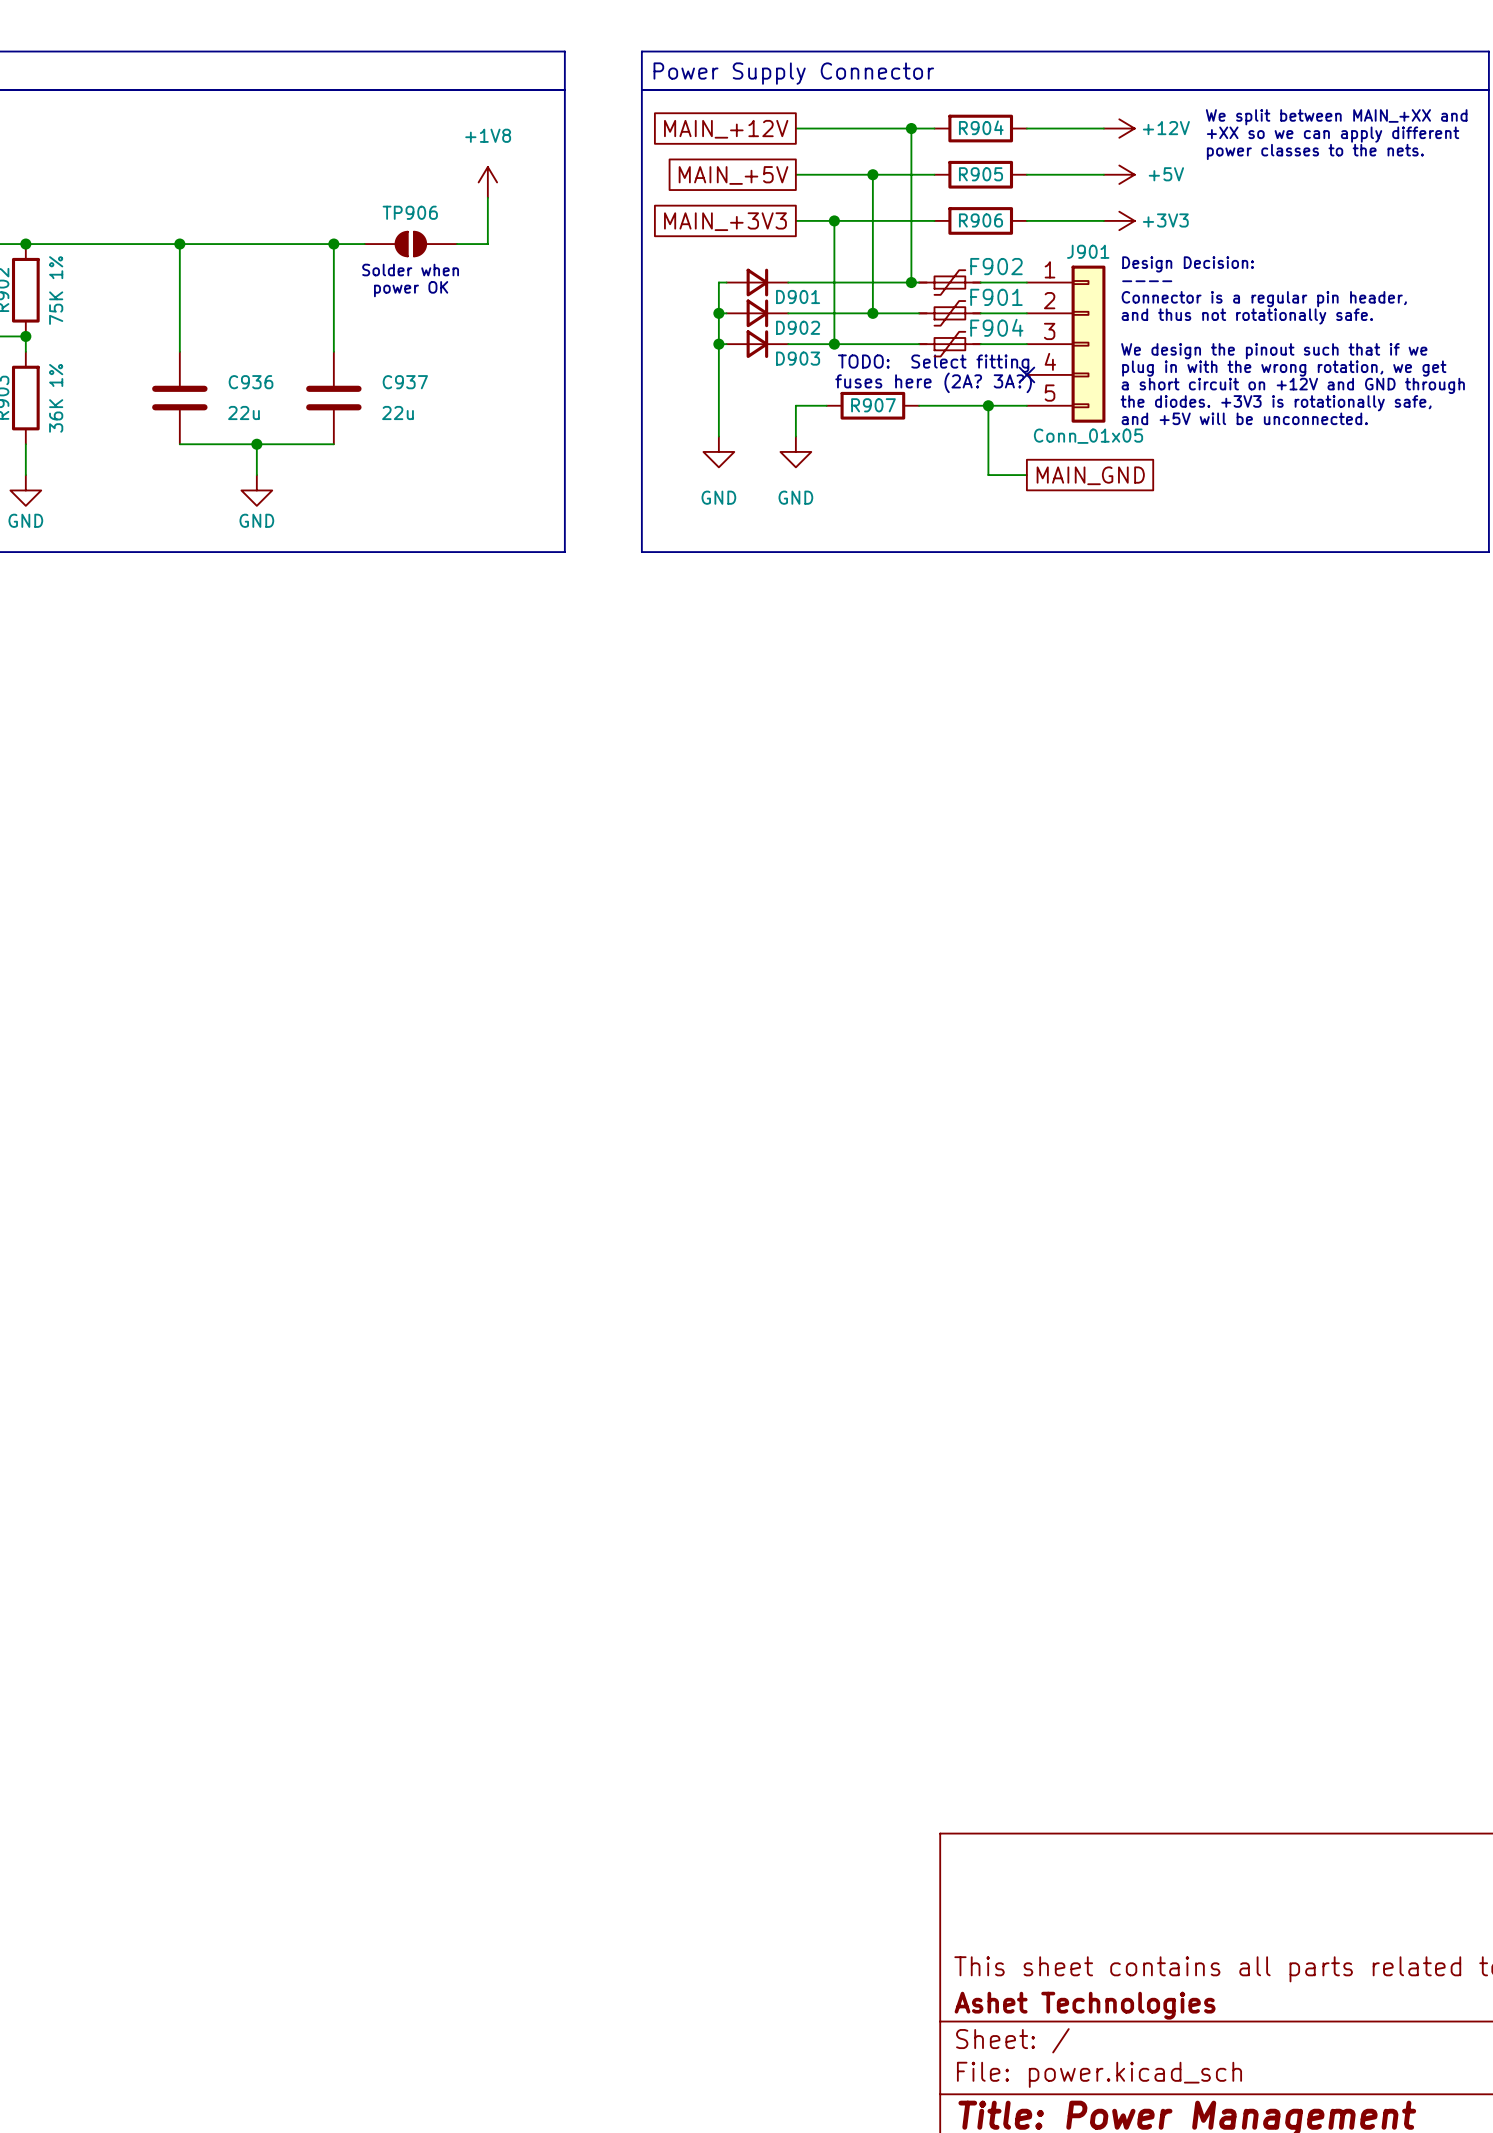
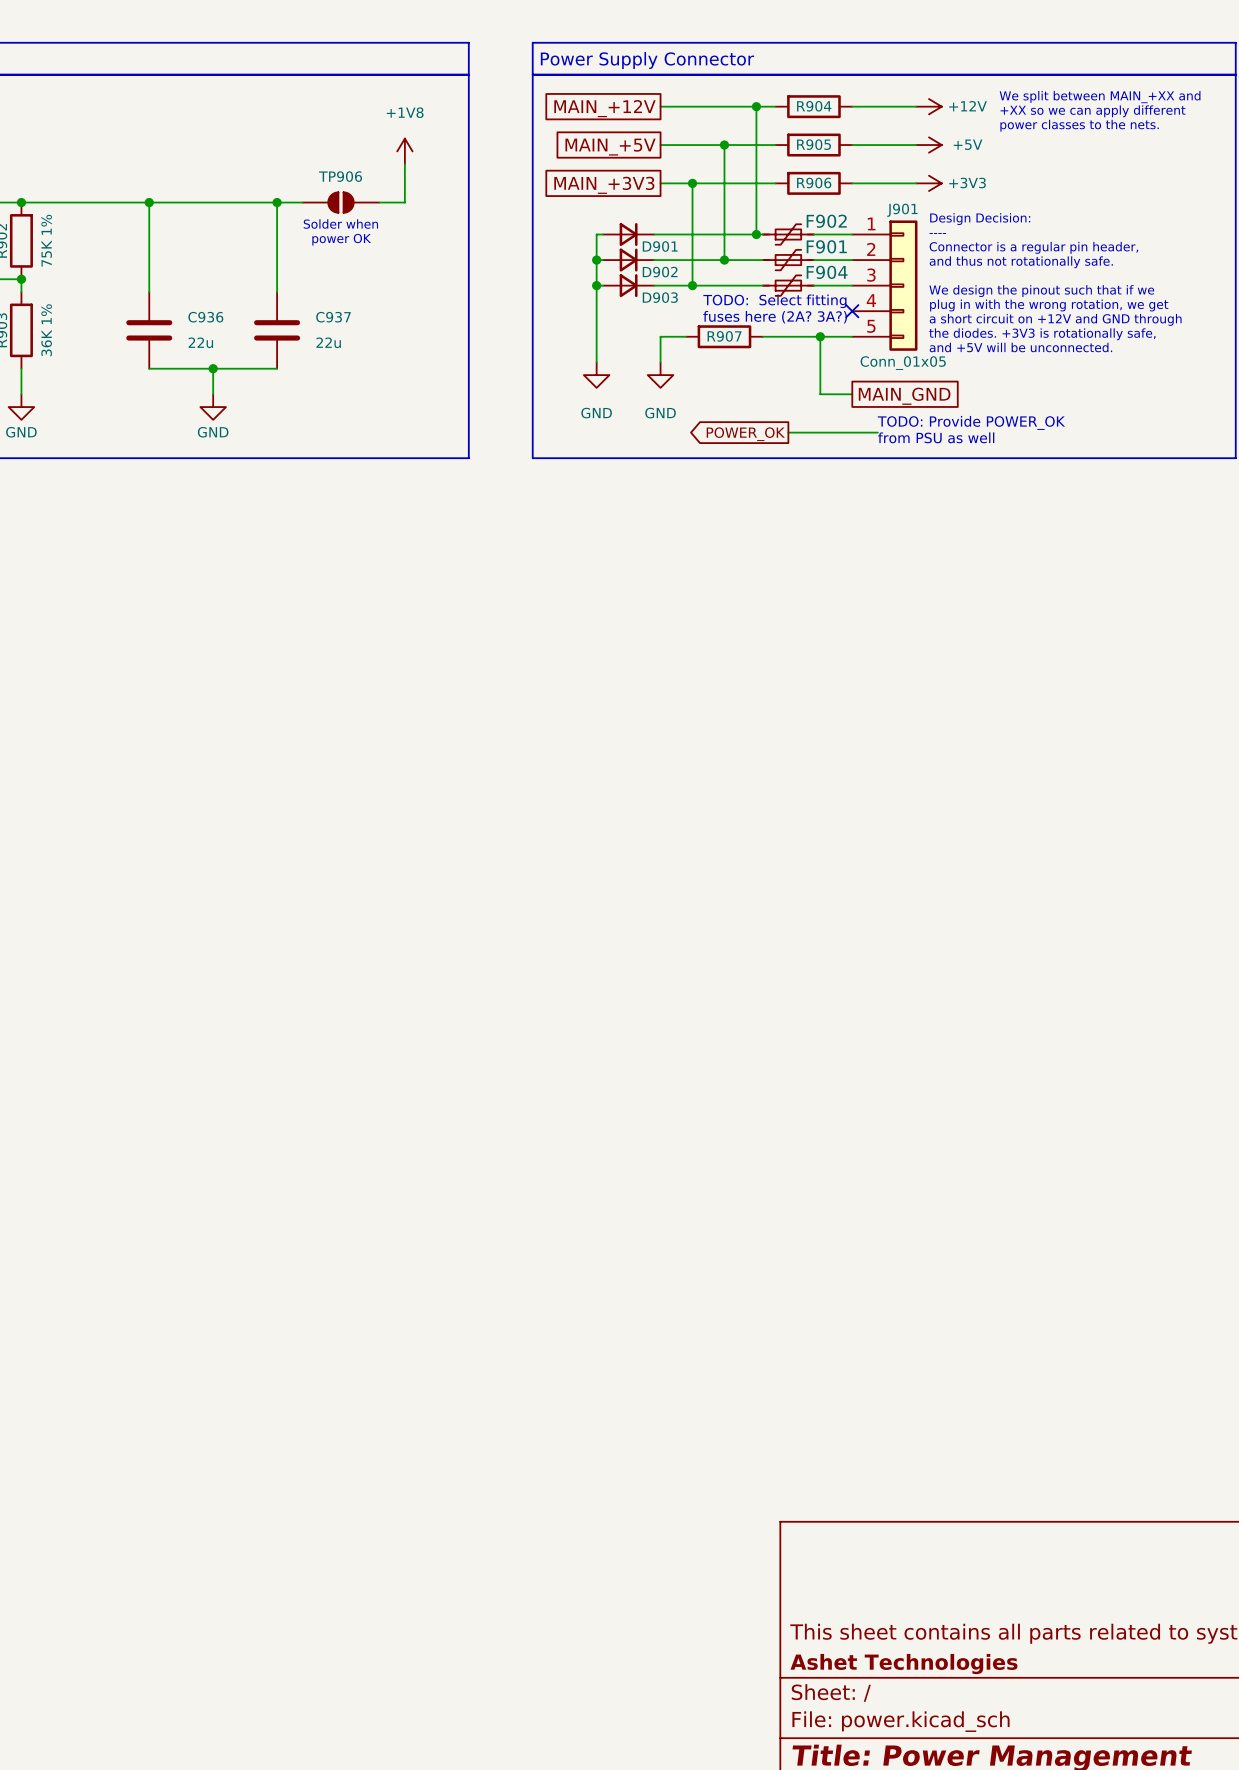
text: none -> TODO: Provide POWER_OK (971, 422)
global label: none -> POWER_OK (745, 434)
wire: none -> (788, 432) (877, 432)
text: none -> from PSU as well (936, 437)

